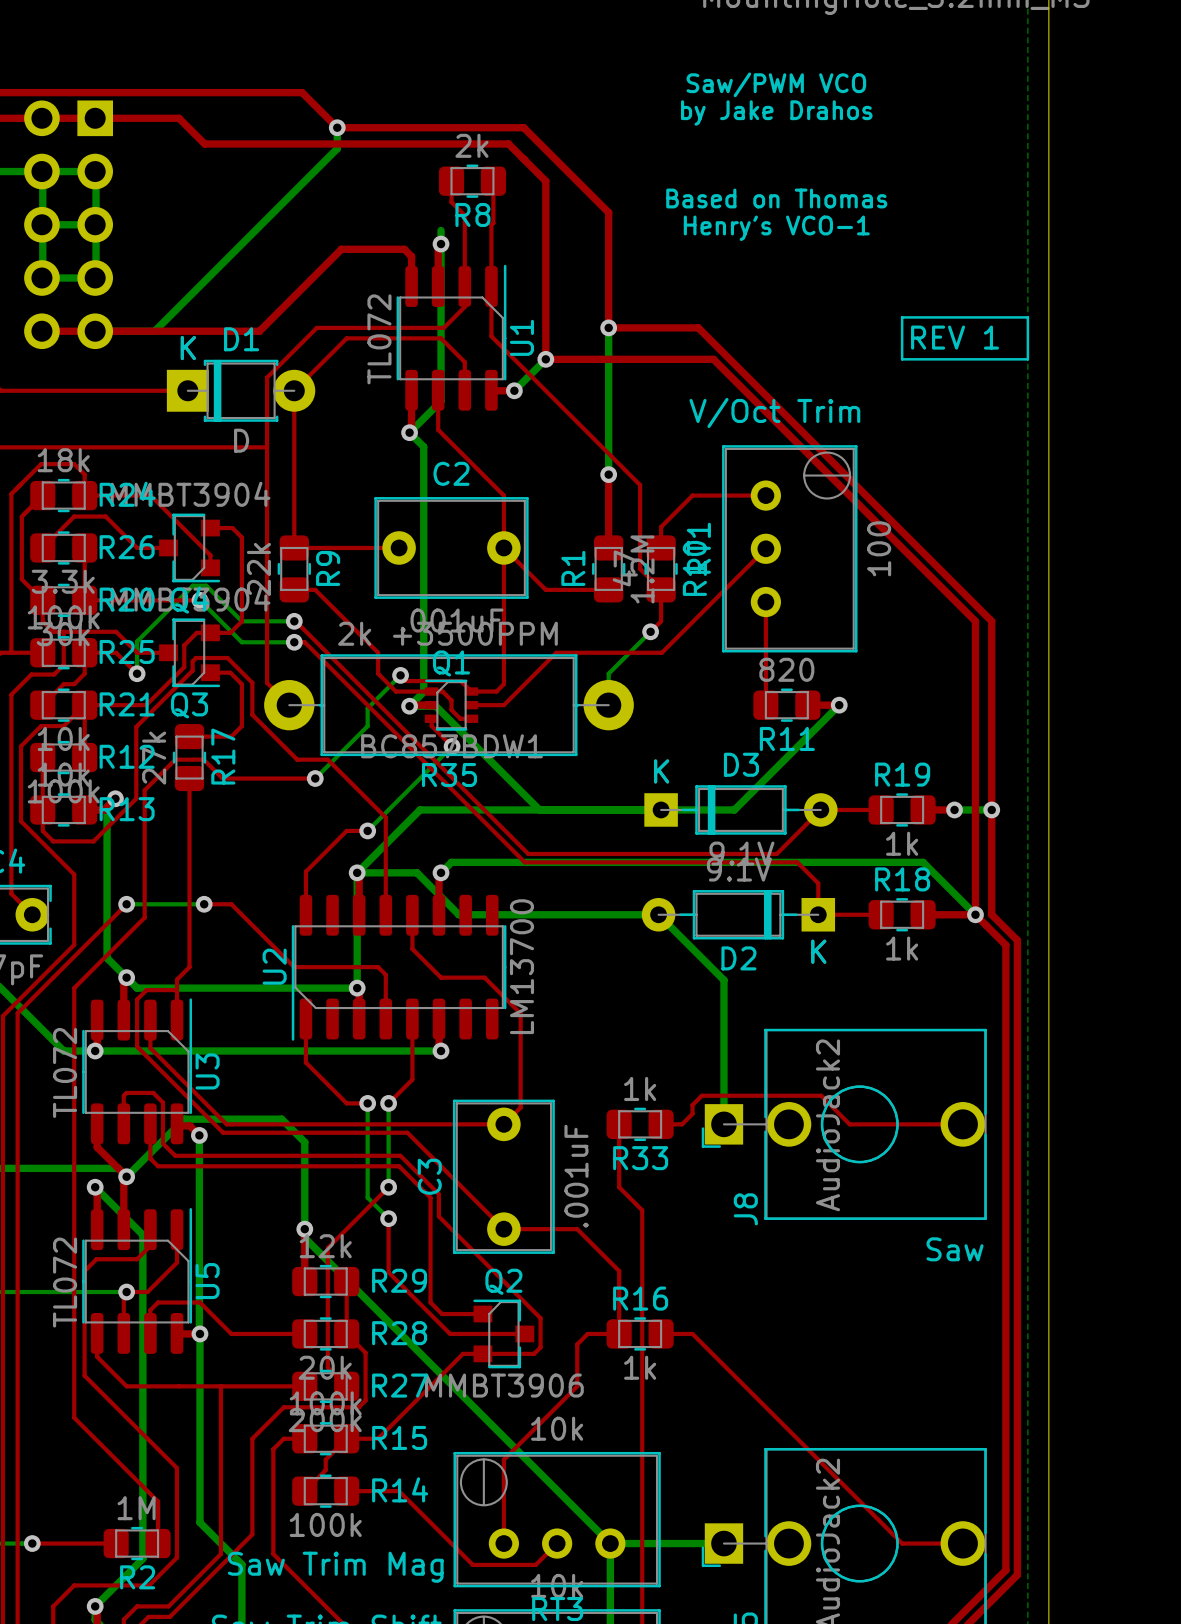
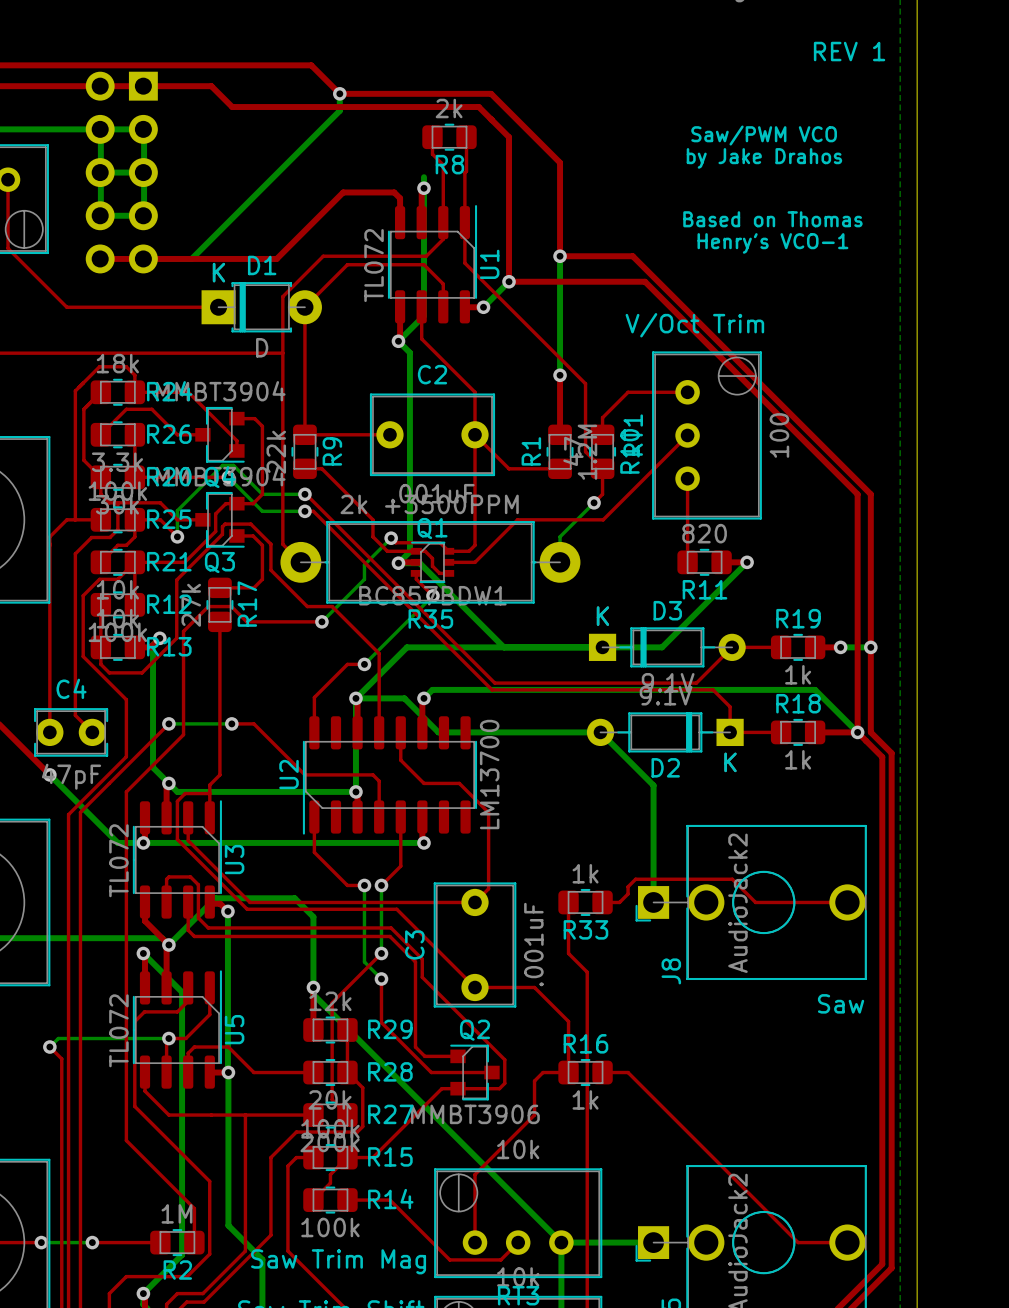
text position: Saw/PWM VCO (776, 84) -> Saw/PWM VCO (764, 135)
text position: by Jake Drahos (776, 113) -> by Jake Drahos (764, 158)
text position: Based on Thomas (776, 198) -> Based on Thomas (772, 219)
text position: Henry's VCO-1 (776, 228) -> Henry's VCO-1 (772, 243)
line: (902, 317) (1027, 317) (1027, 359) (902, 359) (902, 317) -> none
text position: REV 1 (955, 337) -> REV 1 (849, 51)

